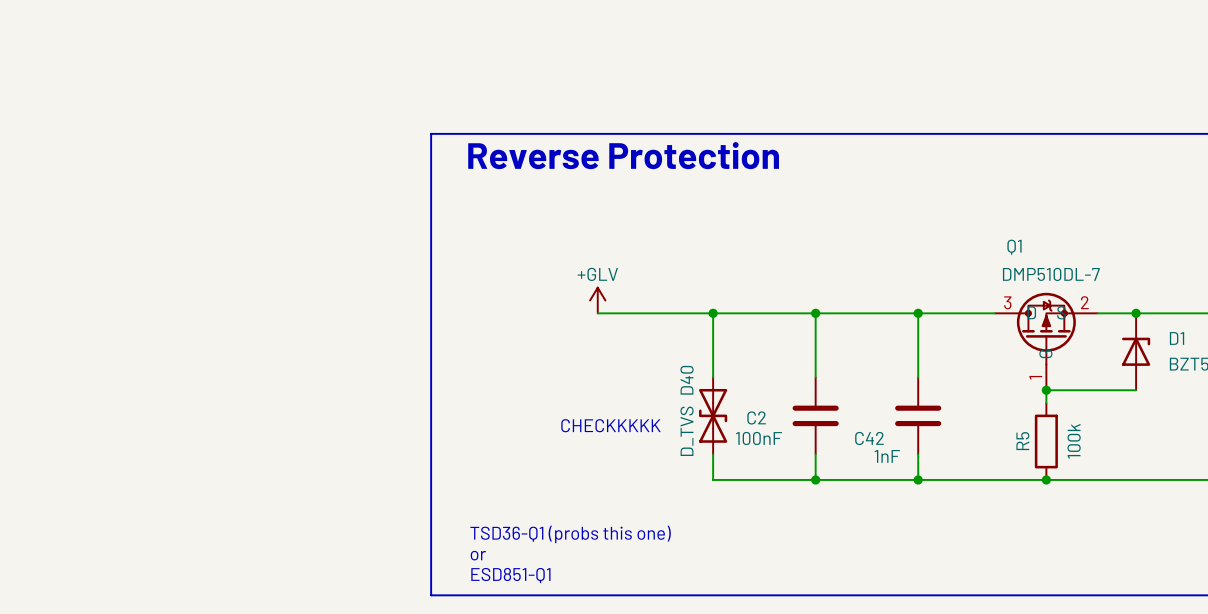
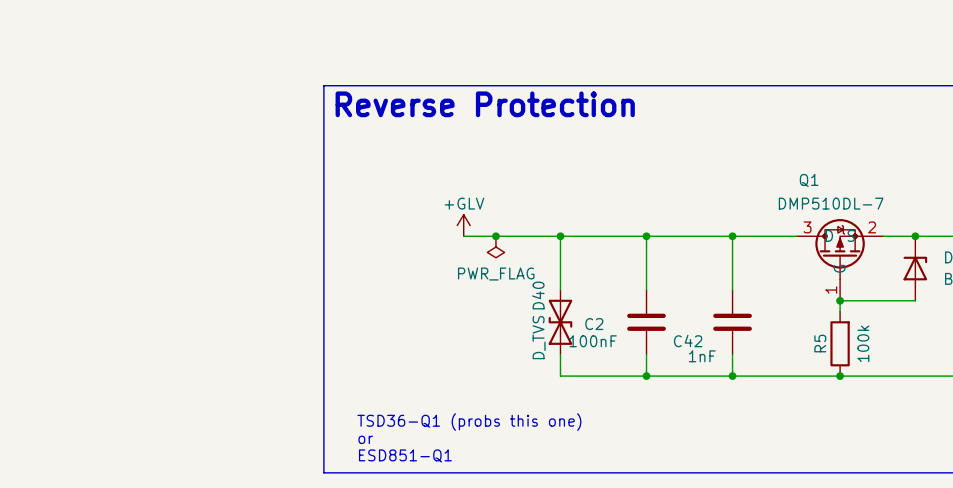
junction: none -> (495, 236)
power symbol: none -> PWR_FLAG (495, 247)
text: CHECKKKKK (610, 425) -> none

